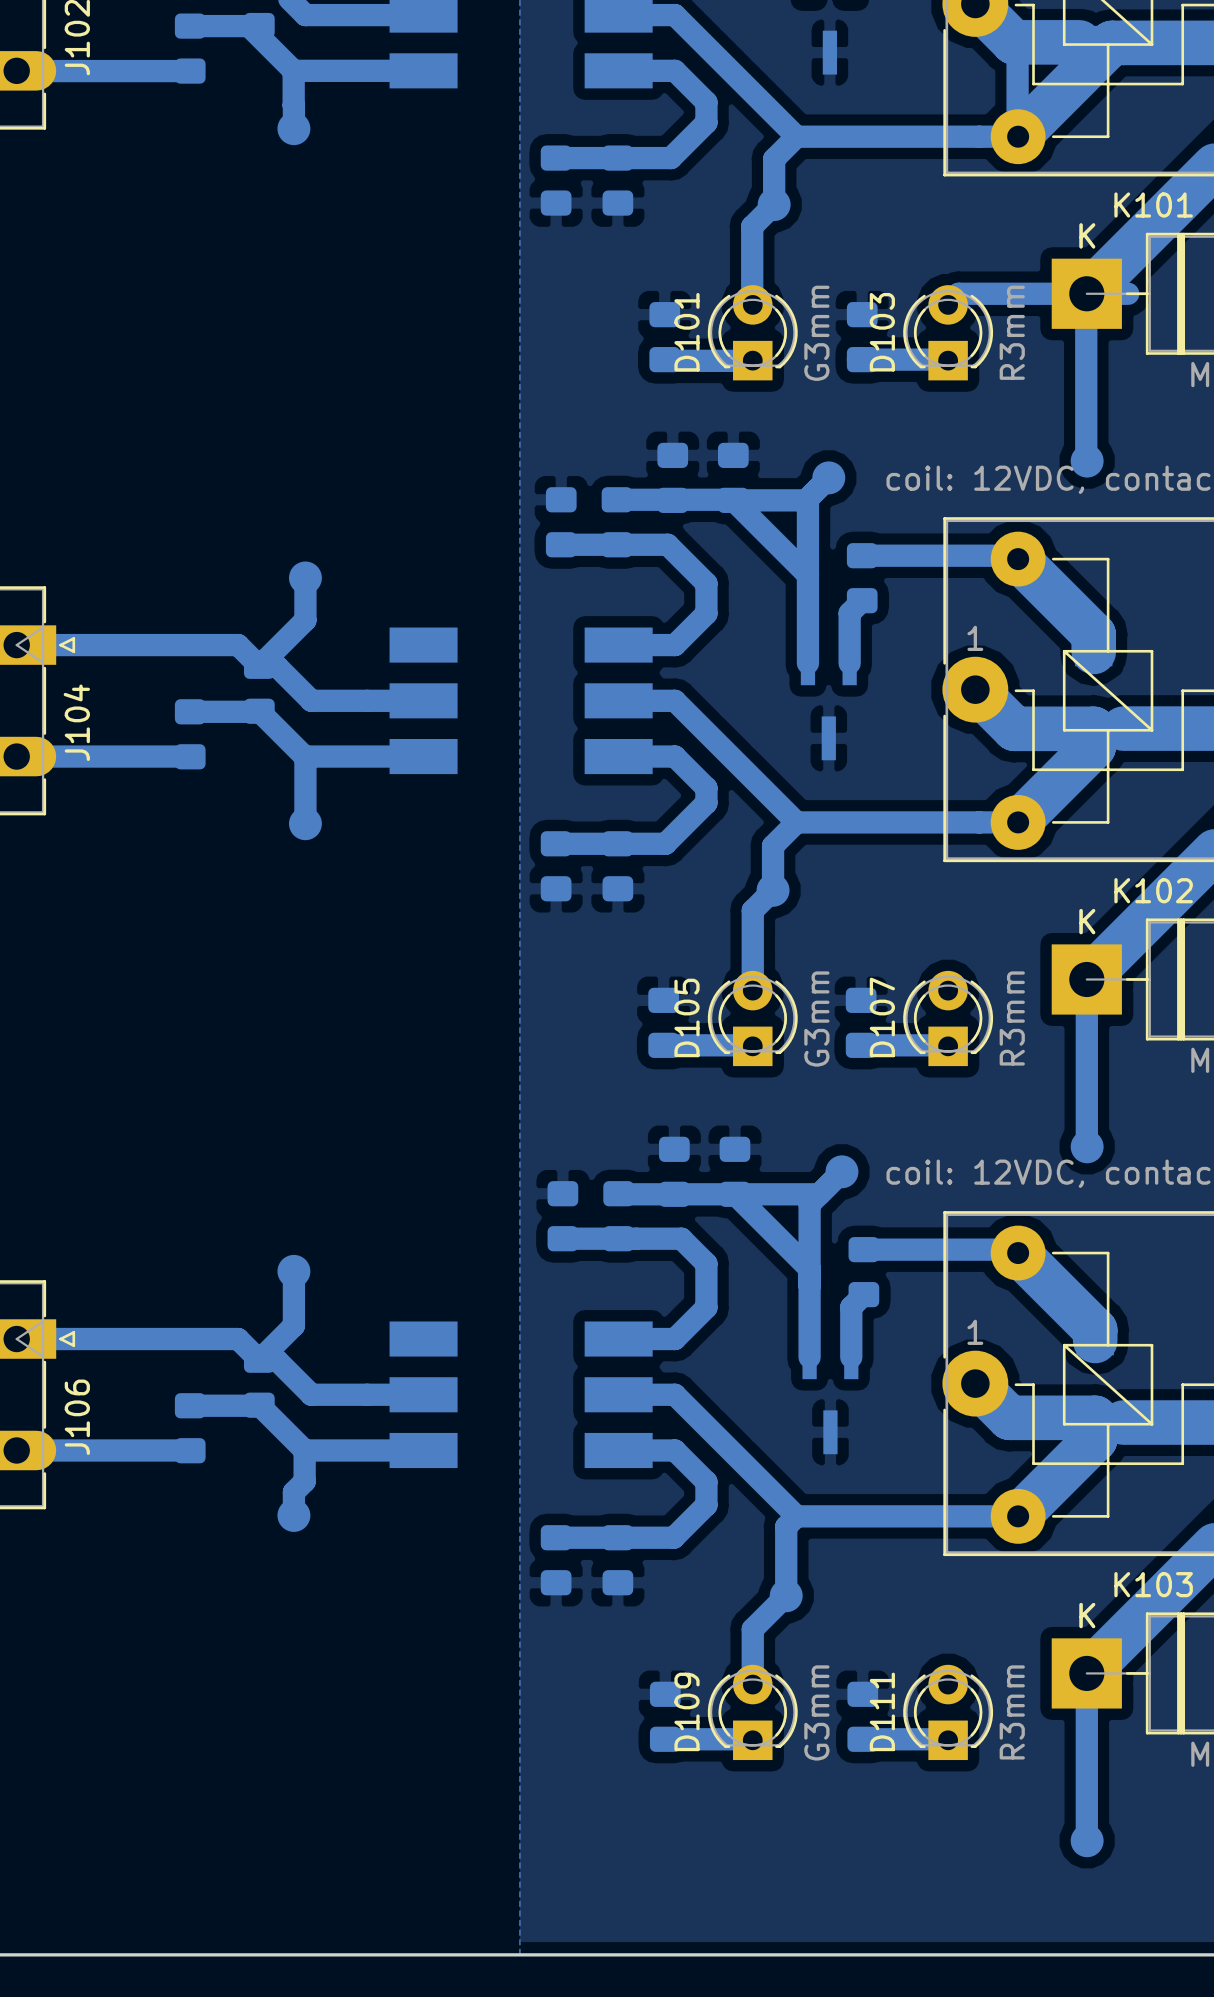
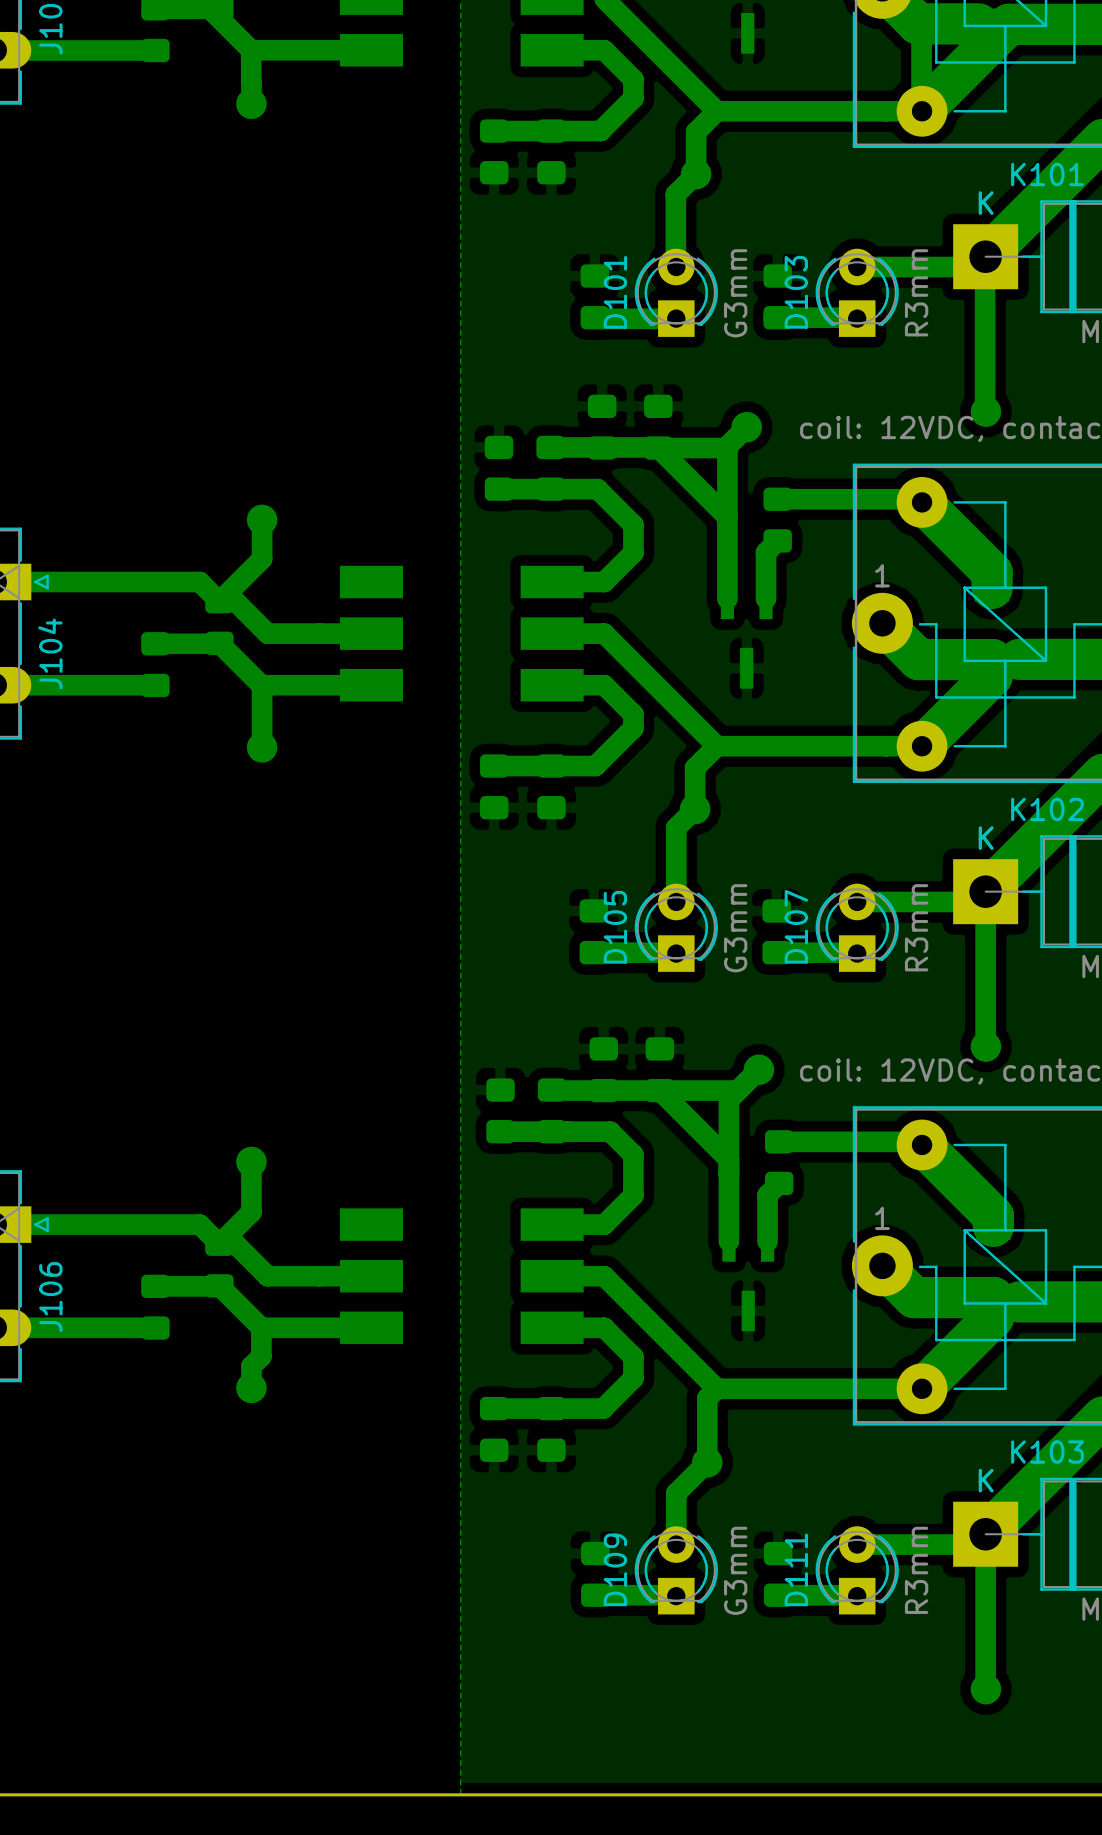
bottom track: (1128, 293) (958, 293) (947, 304) -> (985, 256) (975, 267) (857, 267)
bottom track: none -> (985, 891) (975, 901) (857, 901)
bottom track: none -> (985, 1534) (975, 1544) (857, 1544)

